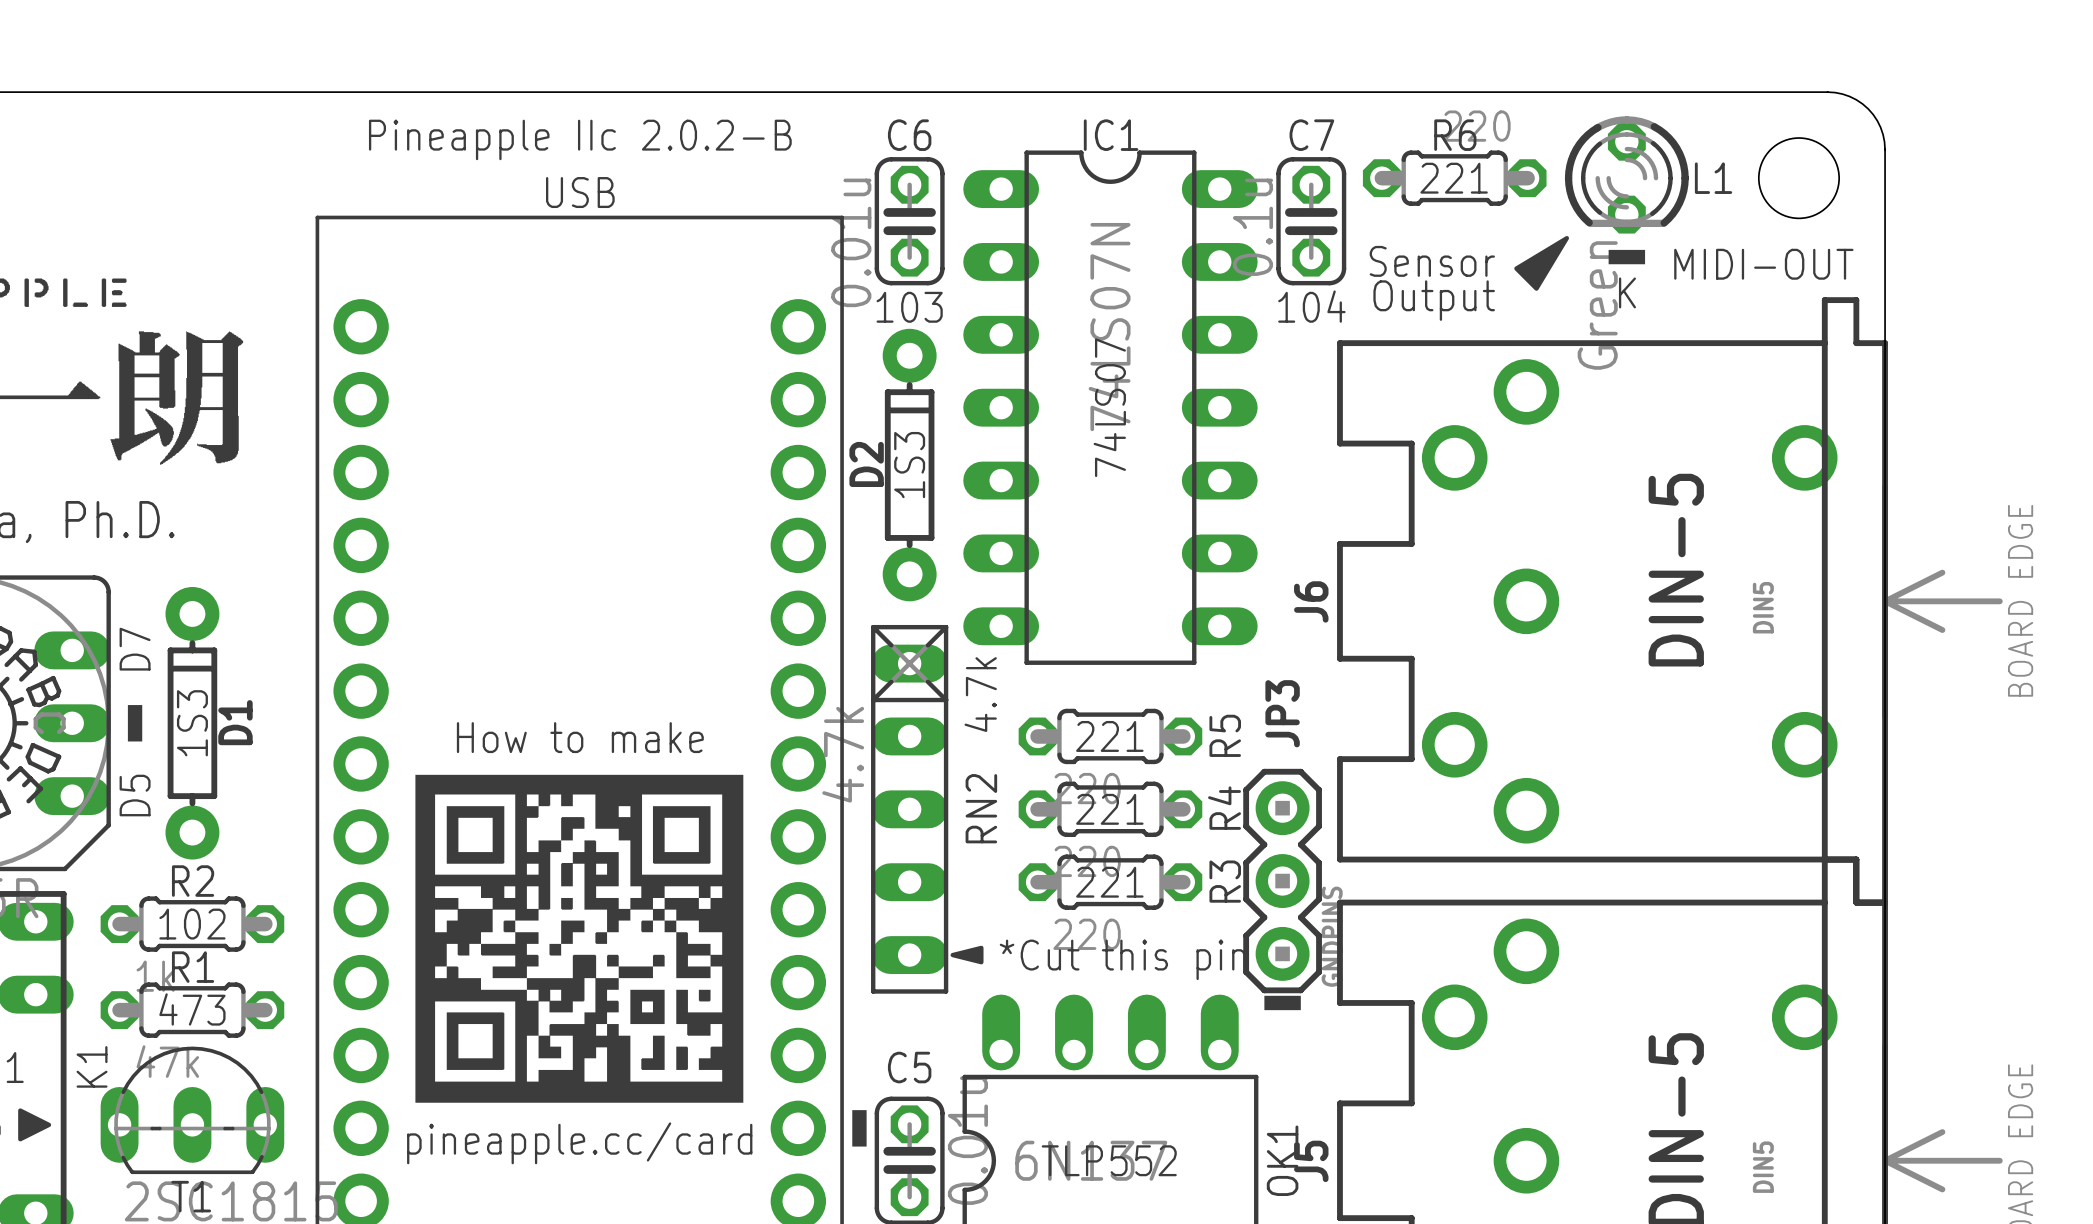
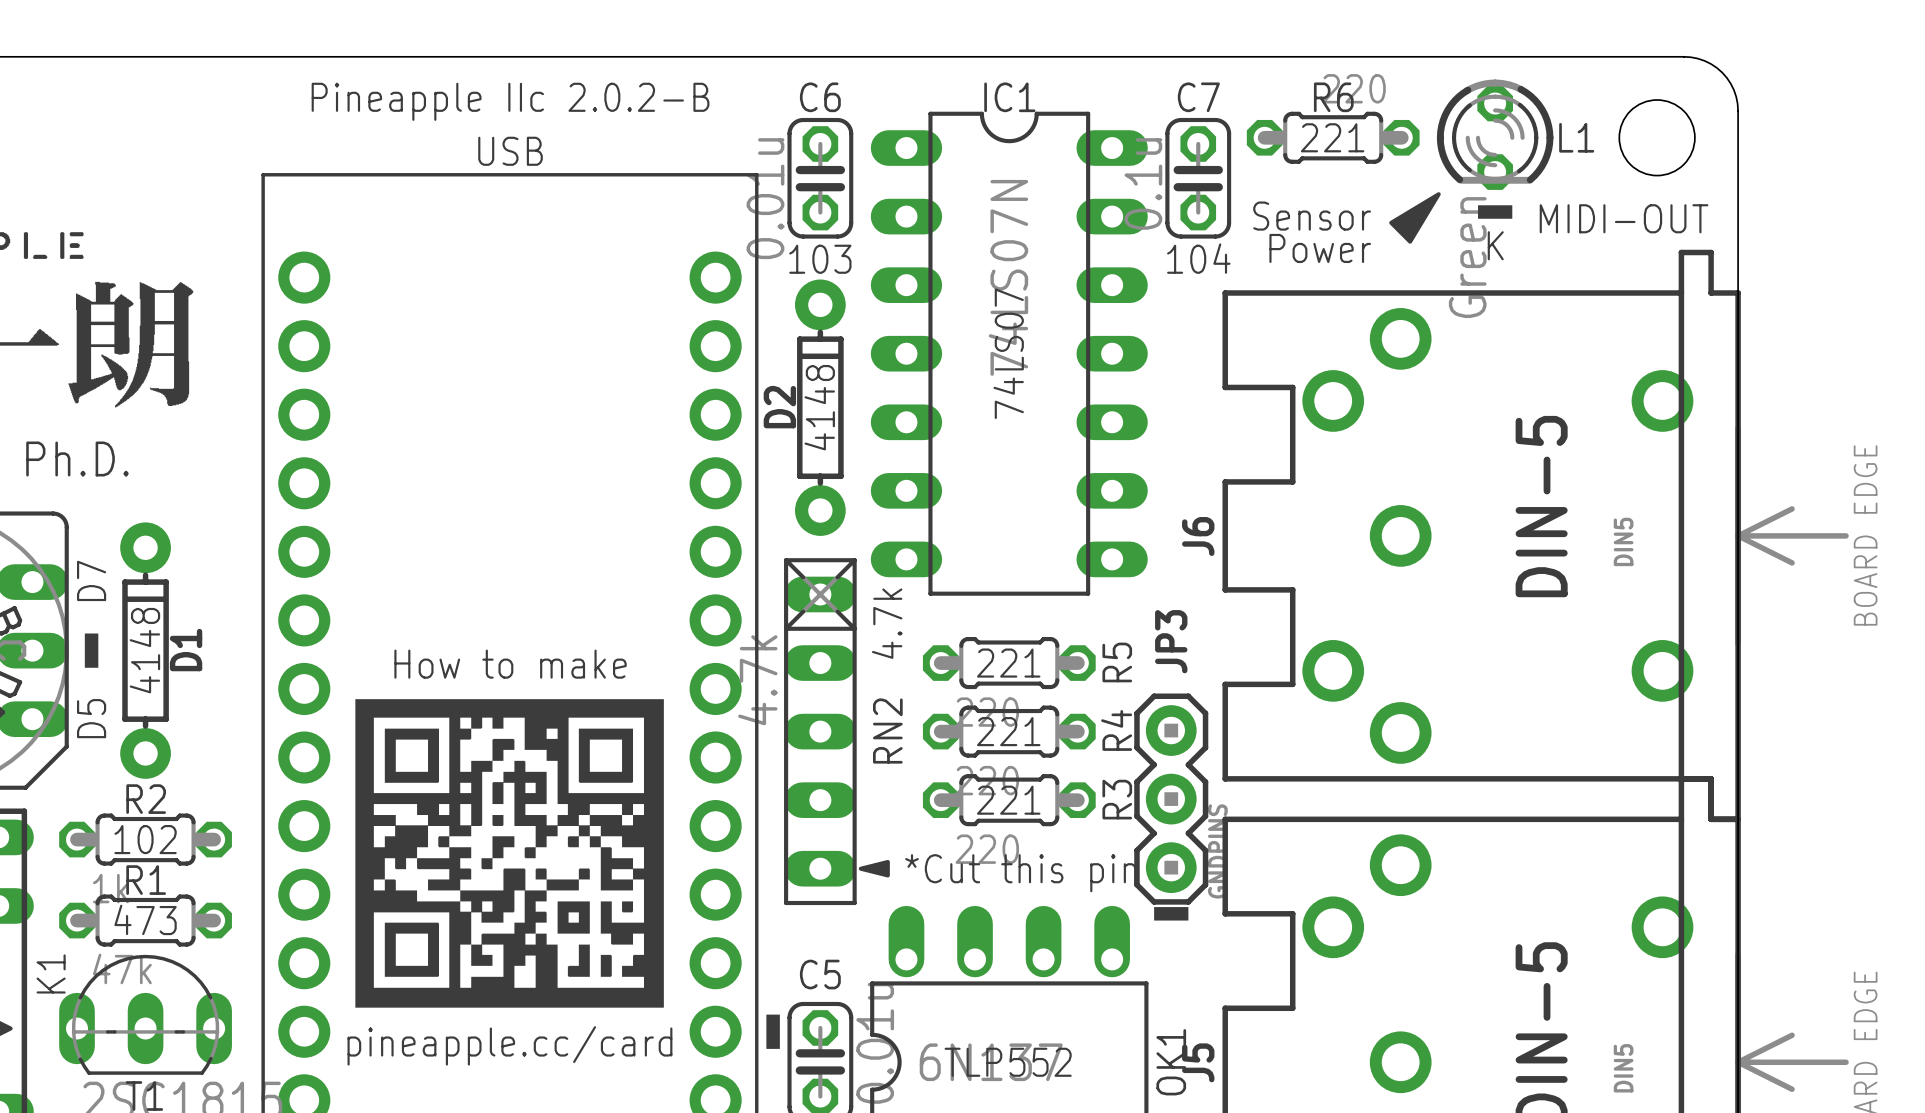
text: Output (1434, 300) -> Power (1320, 248)
text: 1S3 (909, 465) -> 4148 (819, 407)
text: 1S3 (192, 723) -> 4148 (144, 650)

